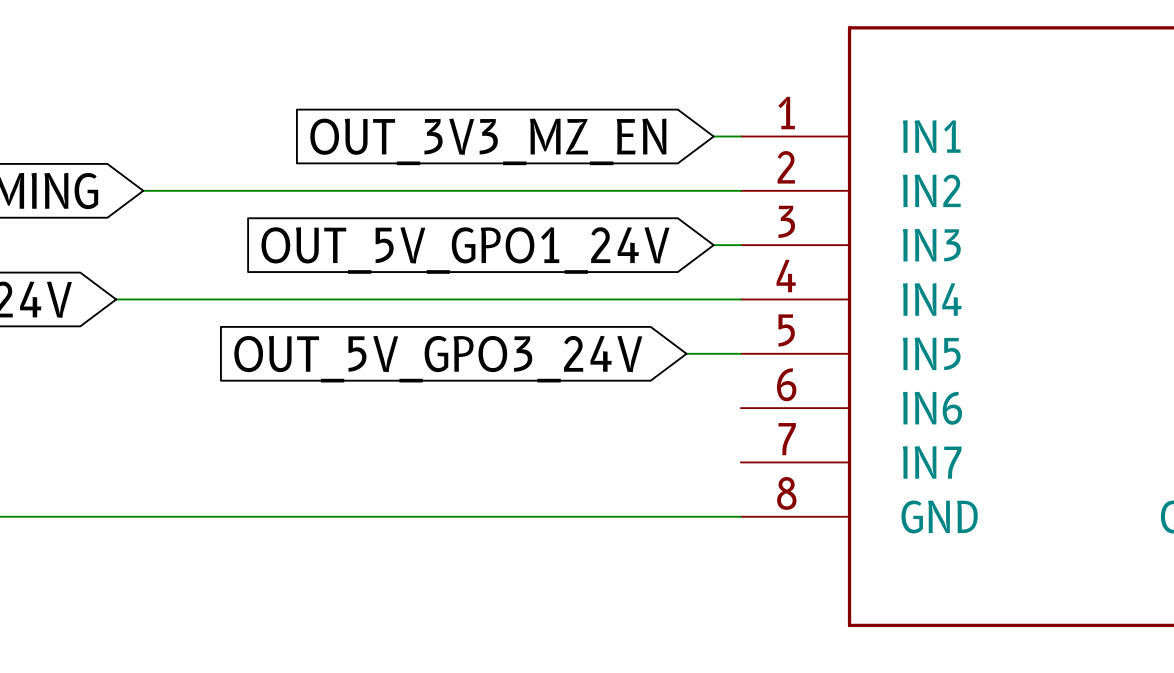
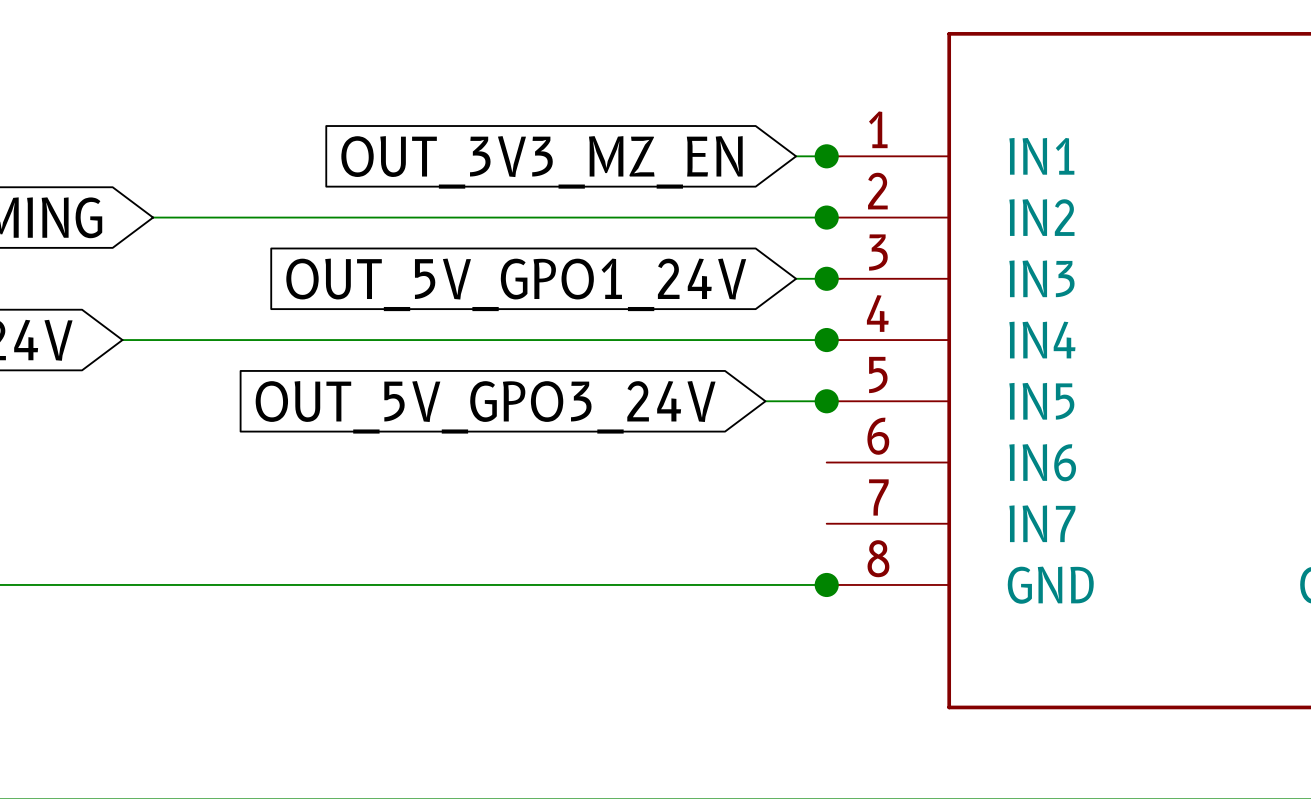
junction: none -> (826, 156)
junction: none -> (826, 217)
junction: none -> (826, 278)
junction: none -> (826, 340)
junction: none -> (826, 401)
junction: none -> (826, 584)

